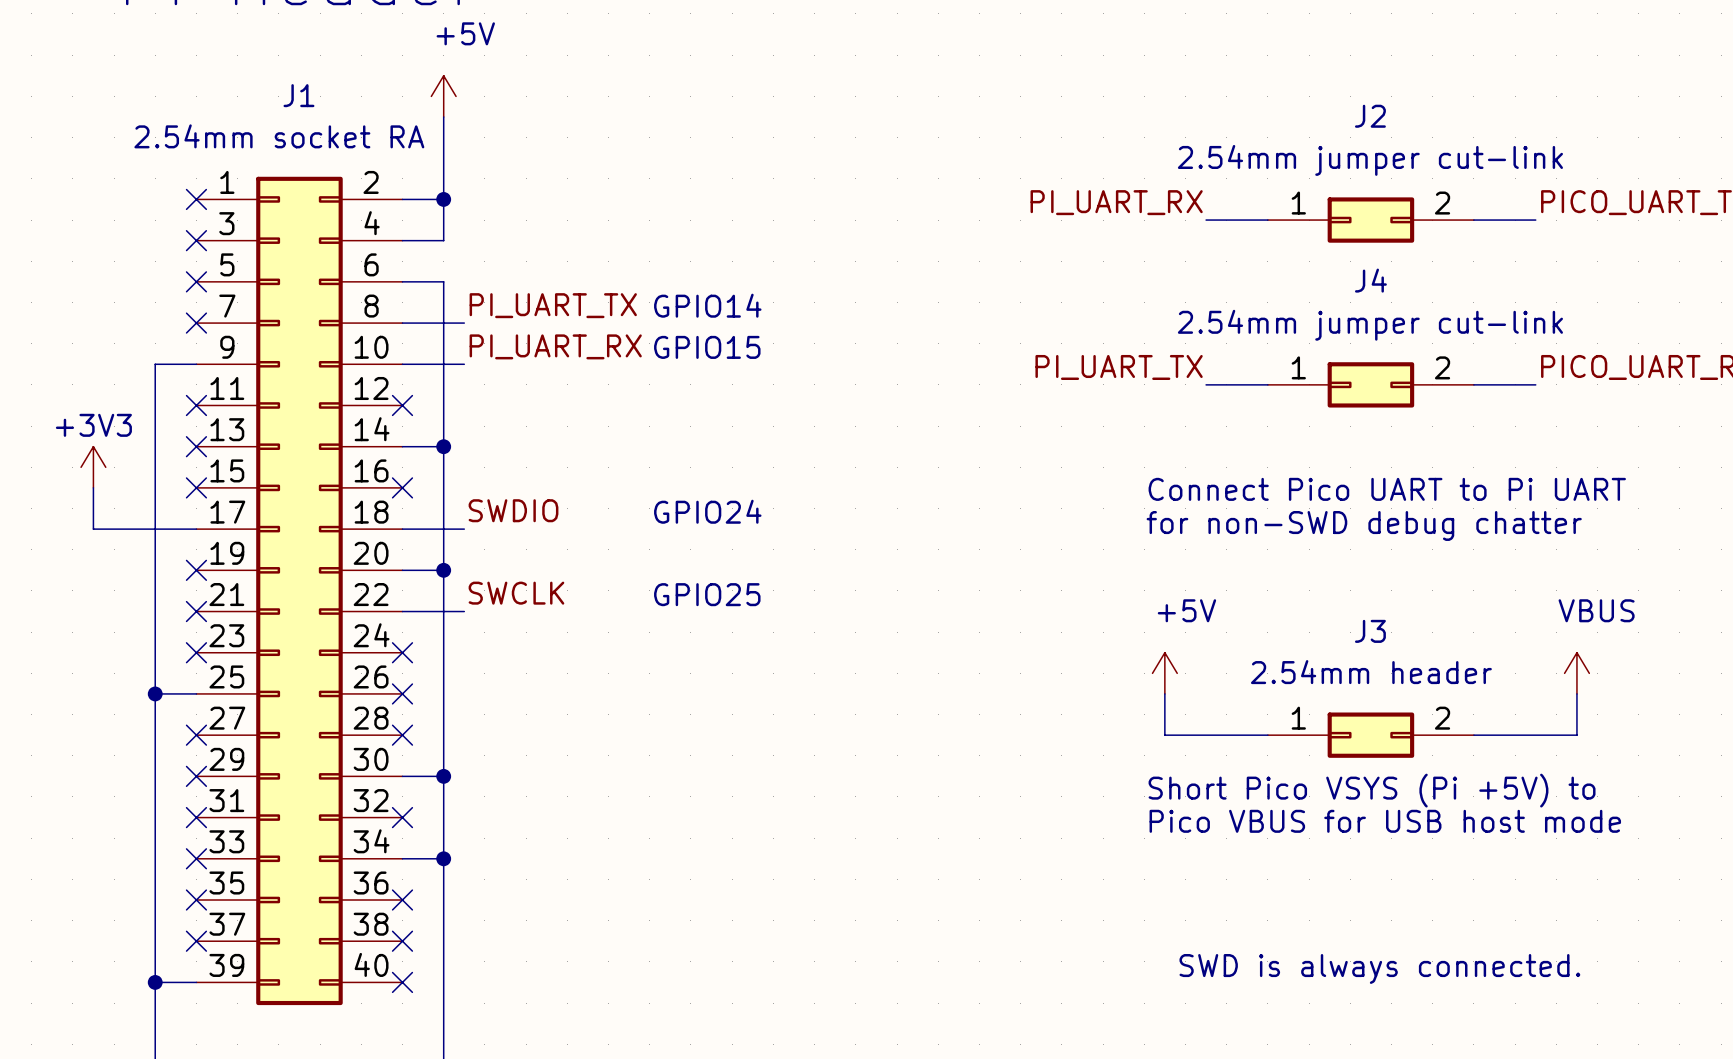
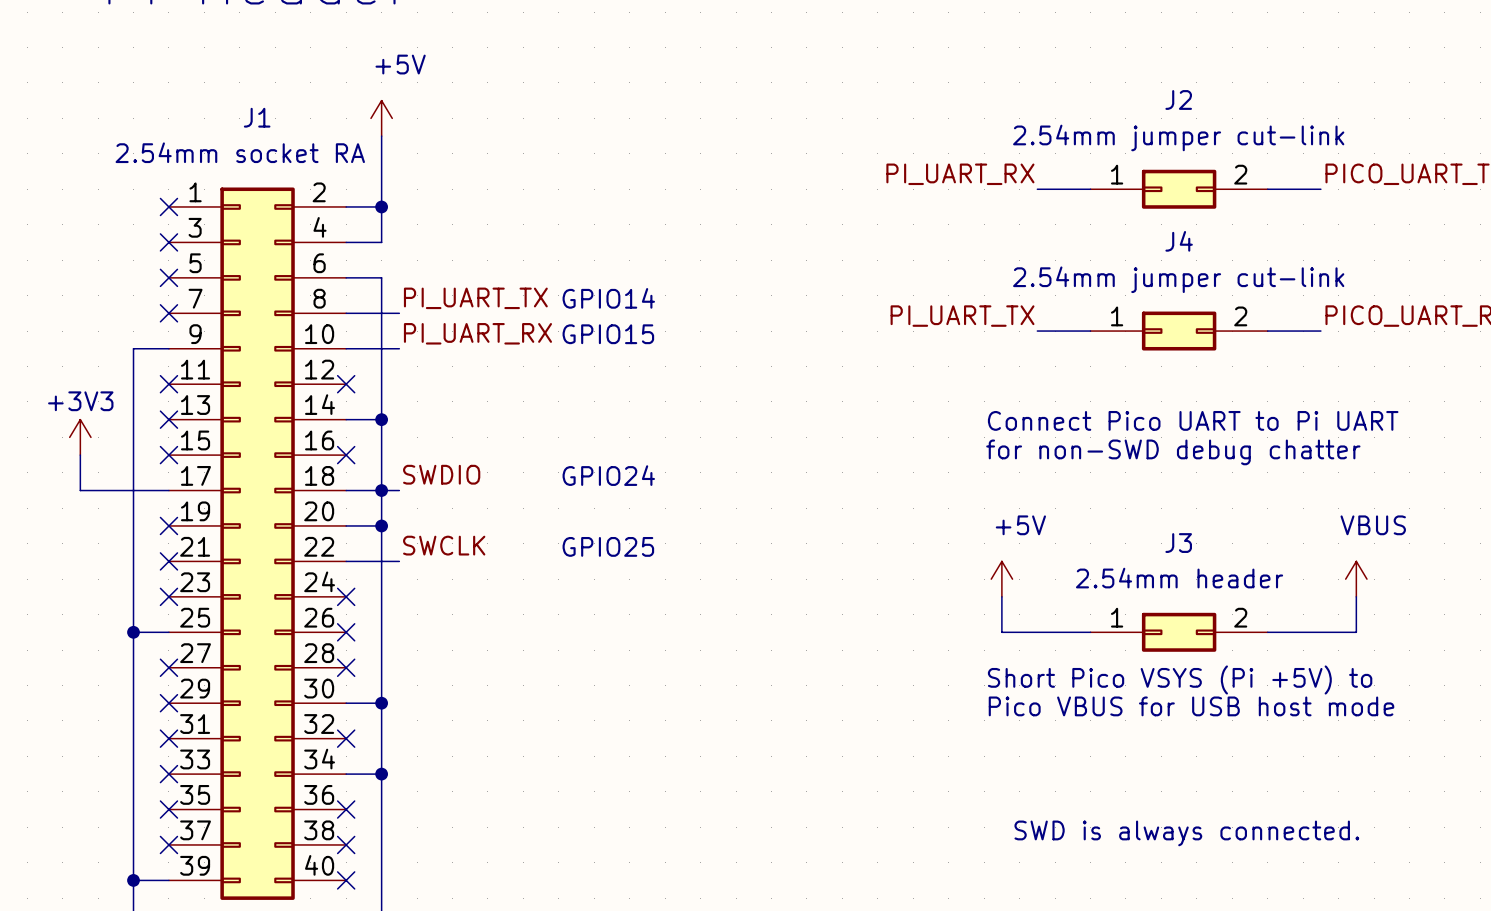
power symbol position: +5V (443, 96) -> +5V (381, 118)
no-connect mark: (196, 199) -> none
wire: (402, 199) (443, 199) -> none
junction position: (443, 199) -> (381, 206)
wire: (443, 281) (443, 323) (464, 323) -> (381, 242) (381, 206)
label: PI_UART_TX (553, 305) -> none
text: GPIO14 (707, 305) -> none
label: PI_UART_RX (555, 346) -> PI_UART_TX (475, 298)
text: GPIO15 (707, 347) -> GPIO14 (608, 298)
wire: (196, 364) (155, 364) (155, 405) -> (168, 348) (133, 348)
label: none -> PI_UART_RX (477, 333)
text: none -> GPIO15 (608, 334)
no-connect mark position: (196, 405) -> (168, 313)
wire: none -> (346, 348) (399, 348)
no-connect mark: (402, 405) -> none
wire: (402, 446) (443, 446) -> (346, 419) (381, 419)
no-connect mark: none -> (346, 384)
junction position: (443, 446) -> (381, 419)
power symbol position: +3V3 (93, 467) -> +3V3 (80, 437)
wire: (93, 487) (93, 529) (196, 529) -> (80, 455) (80, 490) (168, 490)
no-connect mark: (402, 487) -> none
label position: SWDIO (513, 510) -> SWDIO (441, 474)
text position: GPIO24 (707, 511) -> GPIO24 (608, 475)
wire: (402, 529) (464, 529) -> (346, 561) (399, 561)
no-connect mark: none -> (346, 455)
no-connect mark position: (196, 570) -> (168, 455)
J1 position: (299, 590) -> (257, 543)
label position: SWCLK (516, 593) -> SWCLK (444, 545)
text position: GPIO25 (707, 594) -> GPIO25 (608, 546)
wire: (443, 611) (464, 611) -> (381, 490) (399, 490)
junction: none -> (381, 525)
no-connect mark: (402, 652) -> none
wire: (155, 693) (196, 693) -> (133, 632) (168, 632)
junction position: (155, 693) -> (133, 632)
no-connect mark position: (196, 735) -> (168, 596)
wire: (402, 776) (443, 776) -> (346, 703) (381, 703)
no-connect mark: none -> (346, 667)
junction: (443, 776) -> none
no-connect mark: (402, 817) -> none
junction: none -> (381, 703)
wire: (402, 858) (443, 858) -> (346, 774) (381, 774)
no-connect mark: none -> (346, 738)
junction: (443, 858) -> none
no-connect mark: (402, 900) -> none
junction: none -> (381, 774)
wire: (155, 982) (196, 982) -> (133, 880) (168, 880)
junction position: (155, 982) -> (133, 880)
no-connect mark: none -> (168, 844)
no-connect mark: none -> (346, 880)

